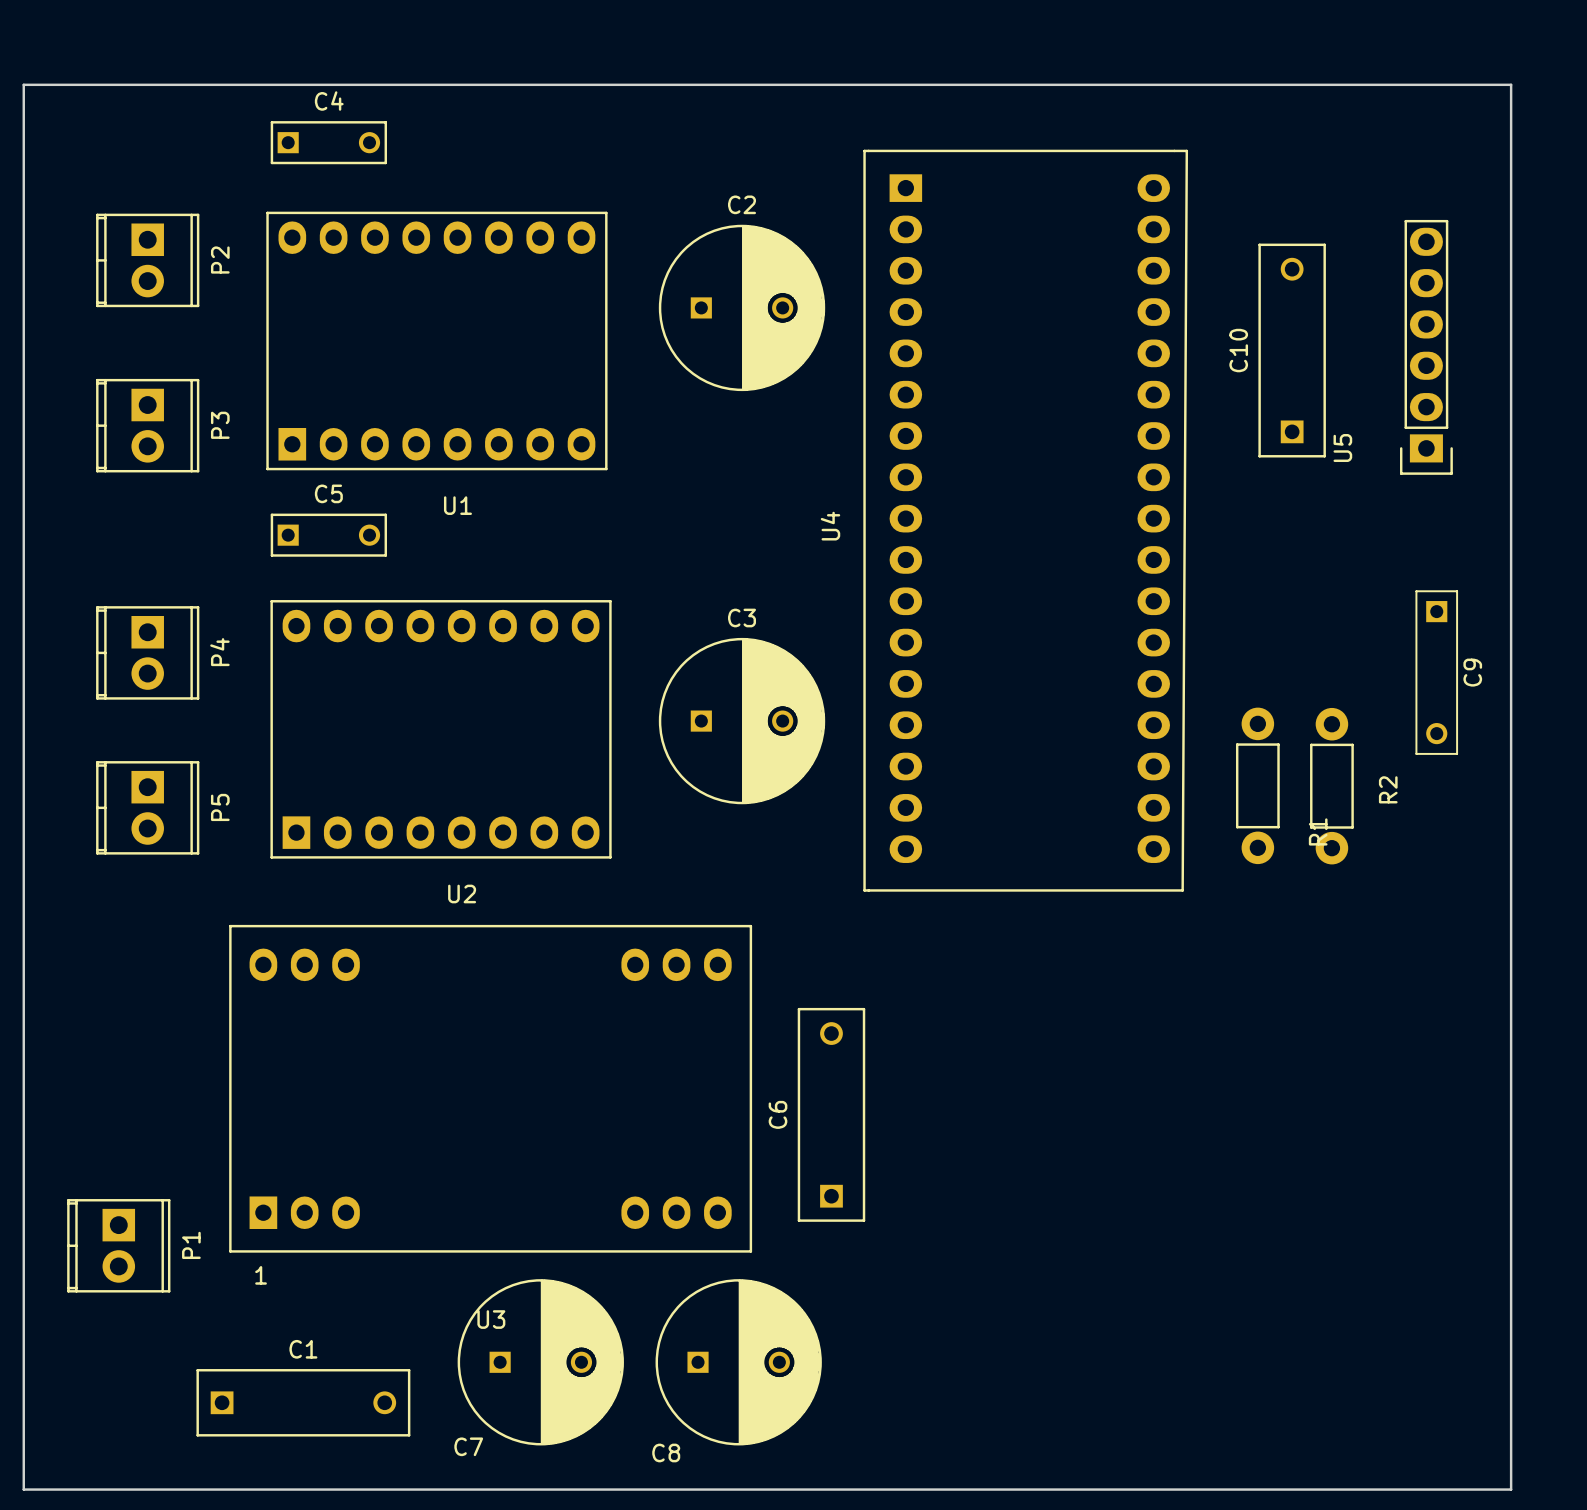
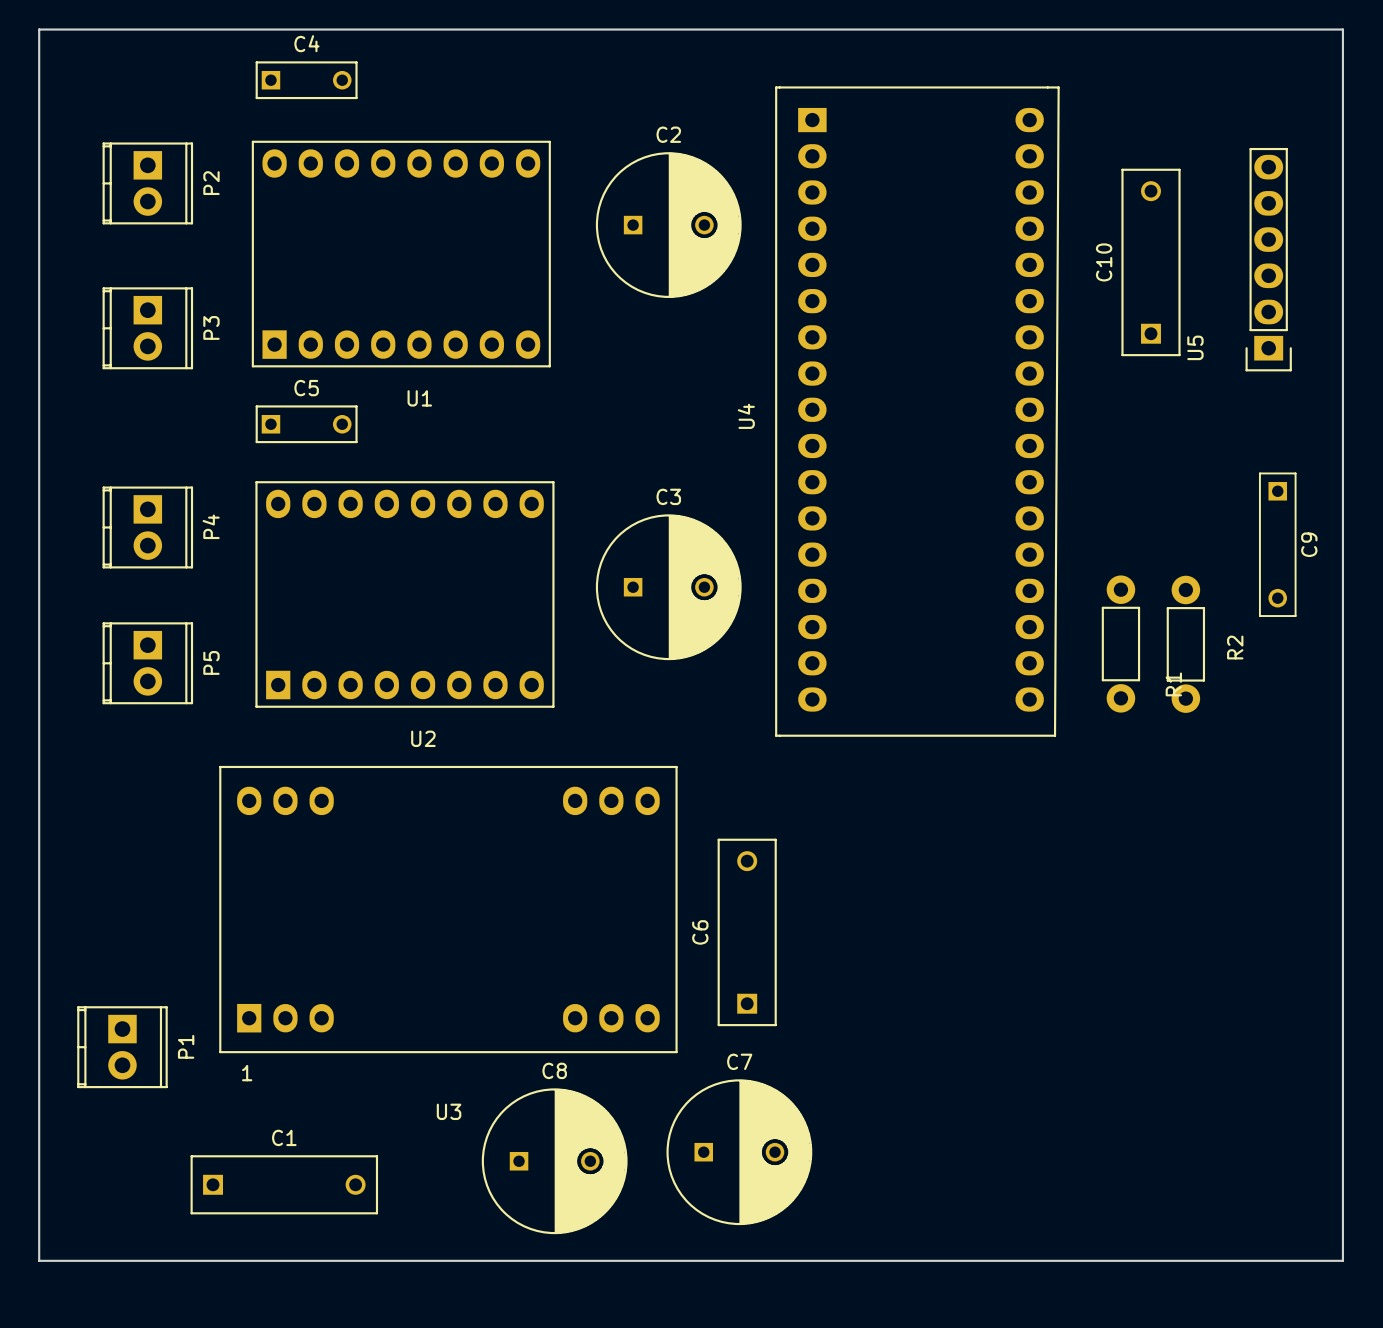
C7 position: (540, 1362) -> (739, 1152)
C8 position: (738, 1362) -> (554, 1161)
C7 name position: C7 (468, 1446) -> C7 (739, 1061)
C8 name position: C8 (666, 1452) -> C8 (554, 1070)

